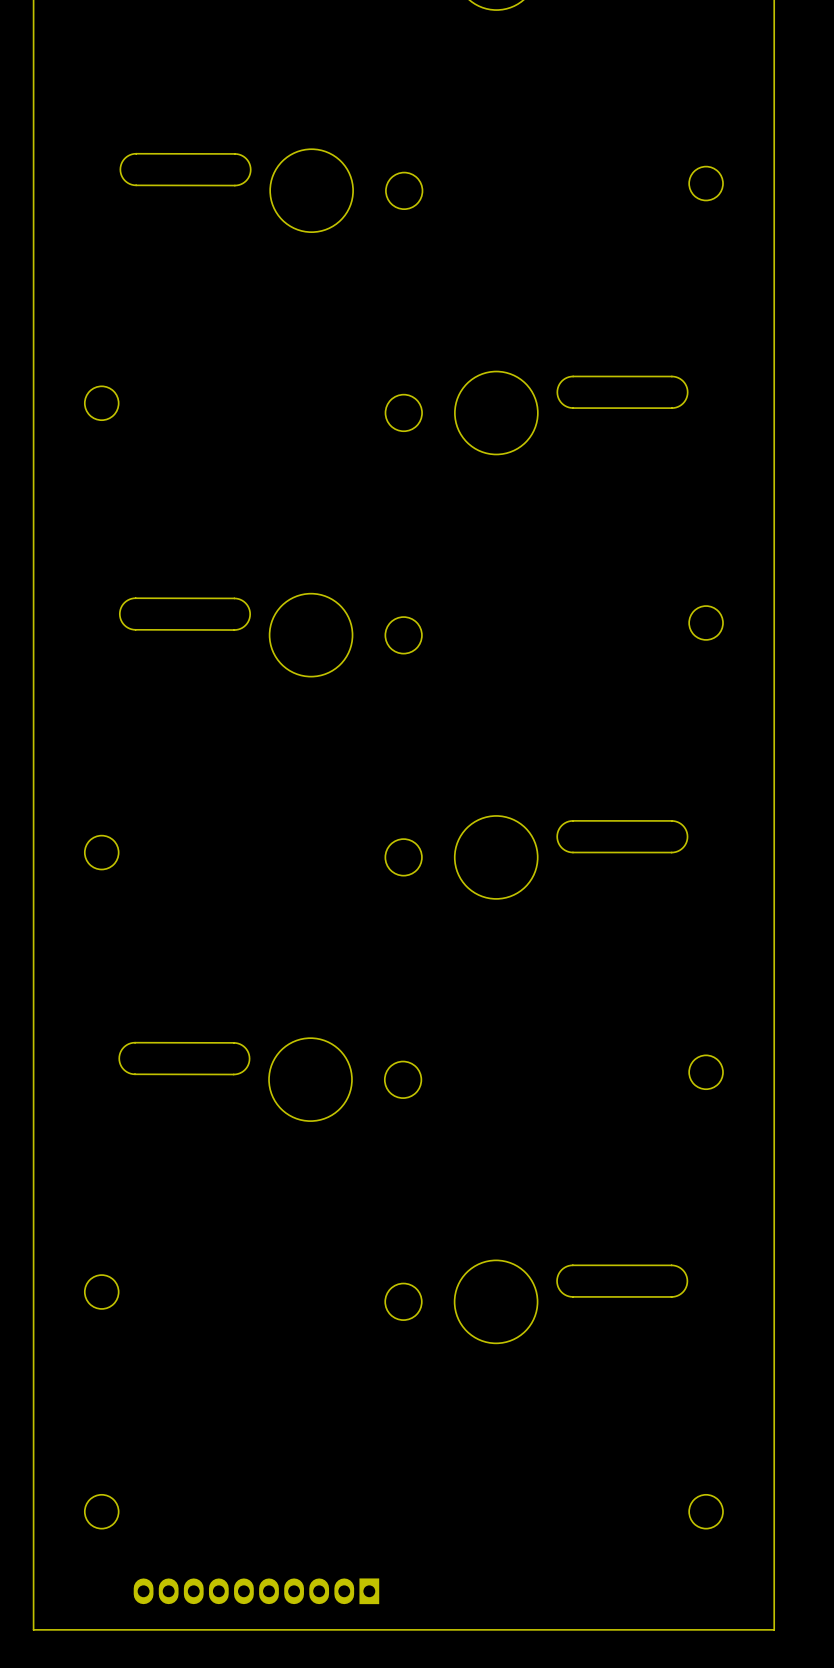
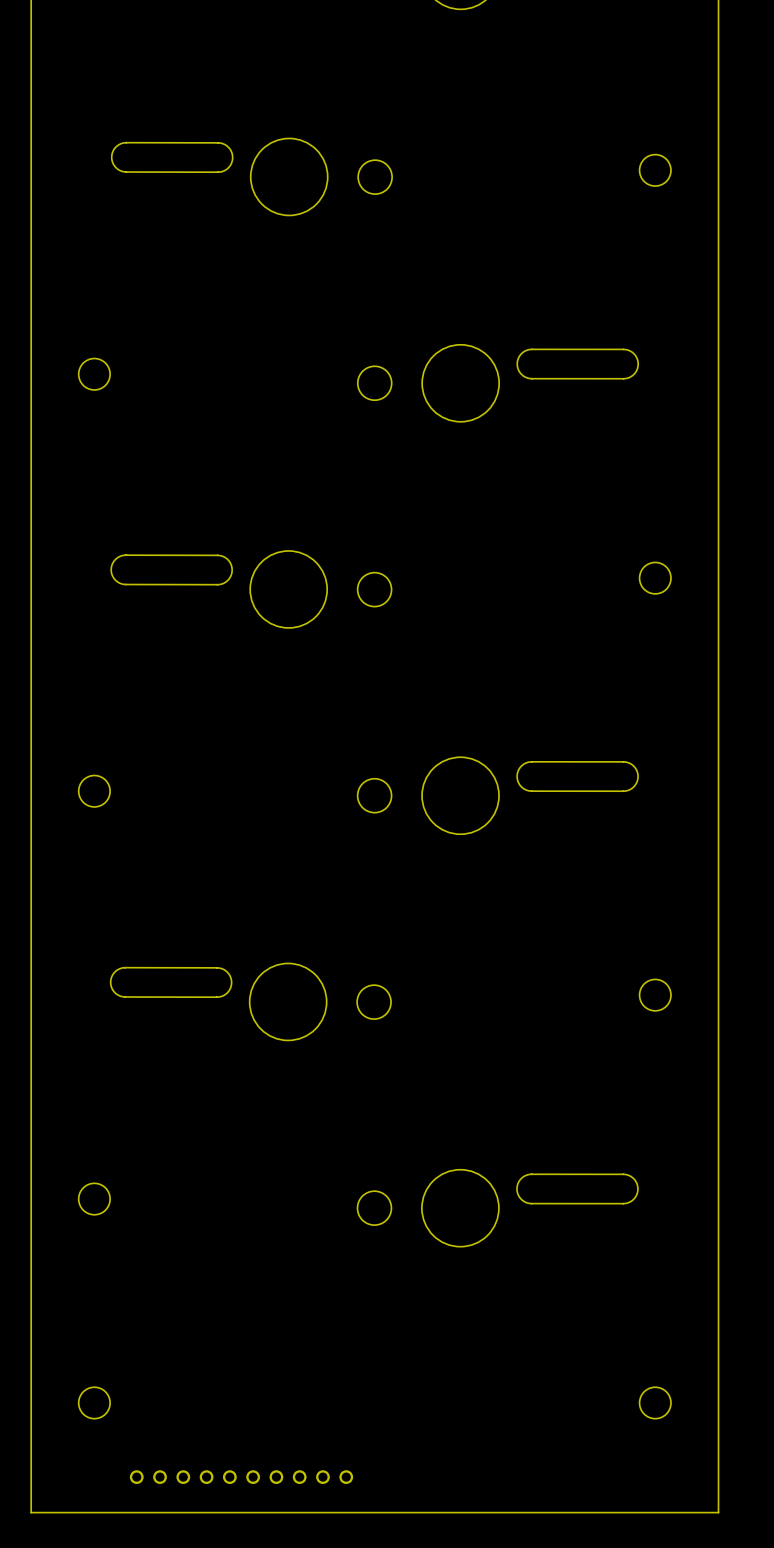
part footprint: [133, 1578, 380, 1605] -> [129, 1470, 354, 1484]

